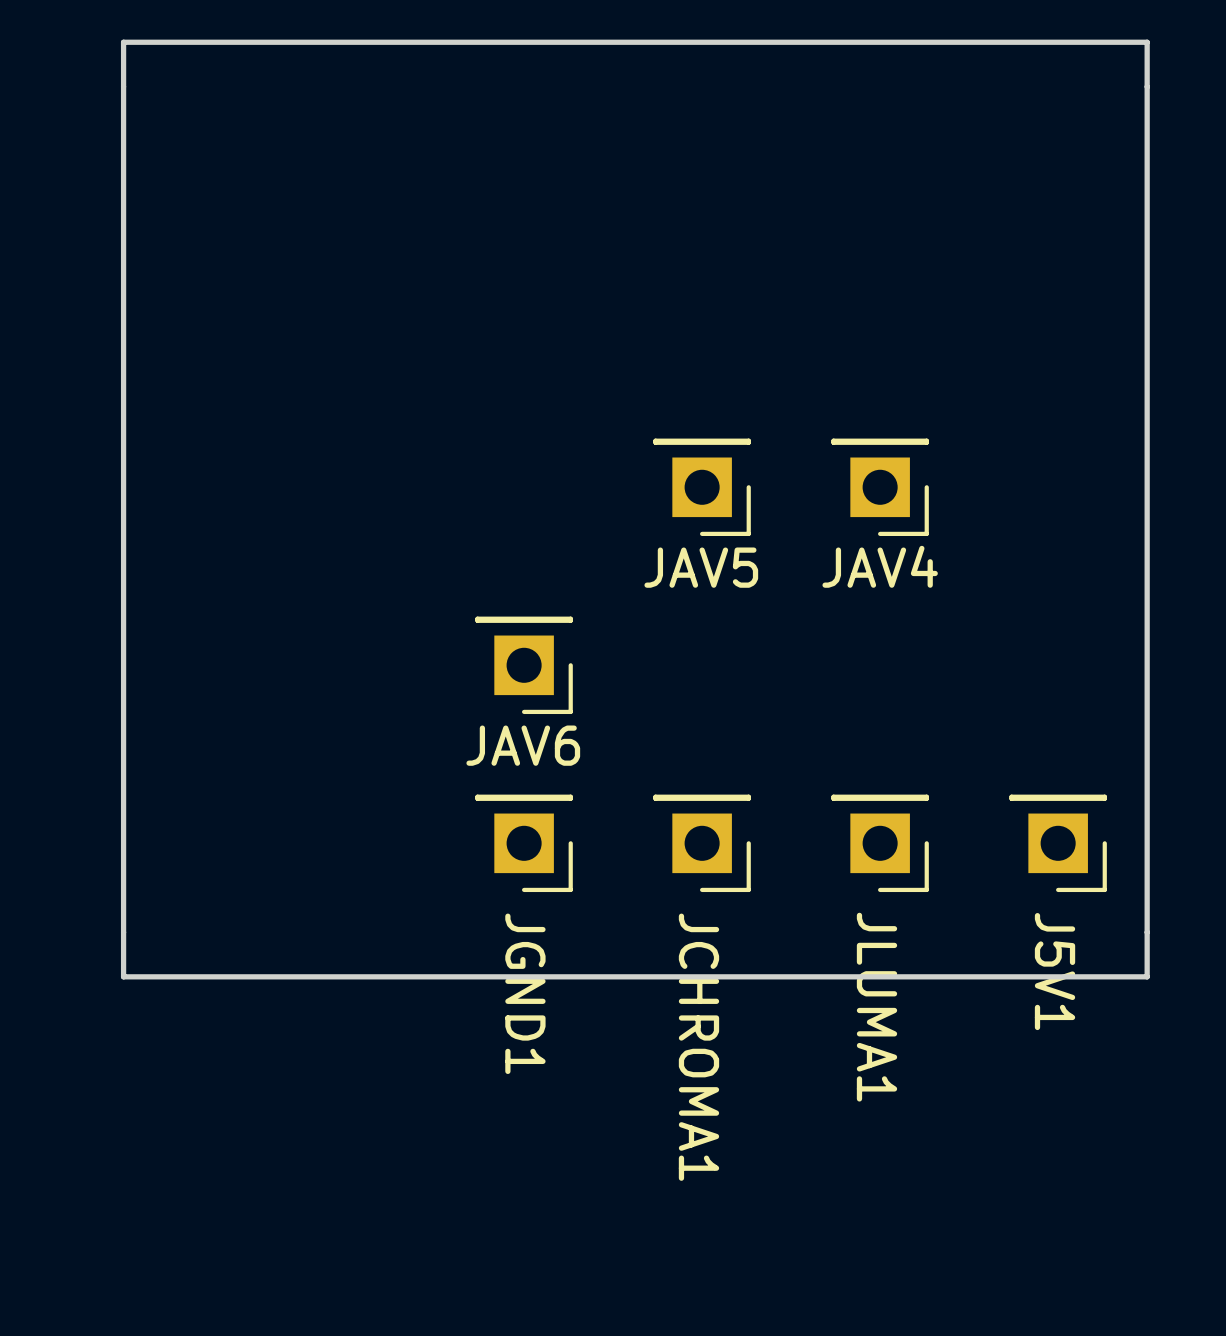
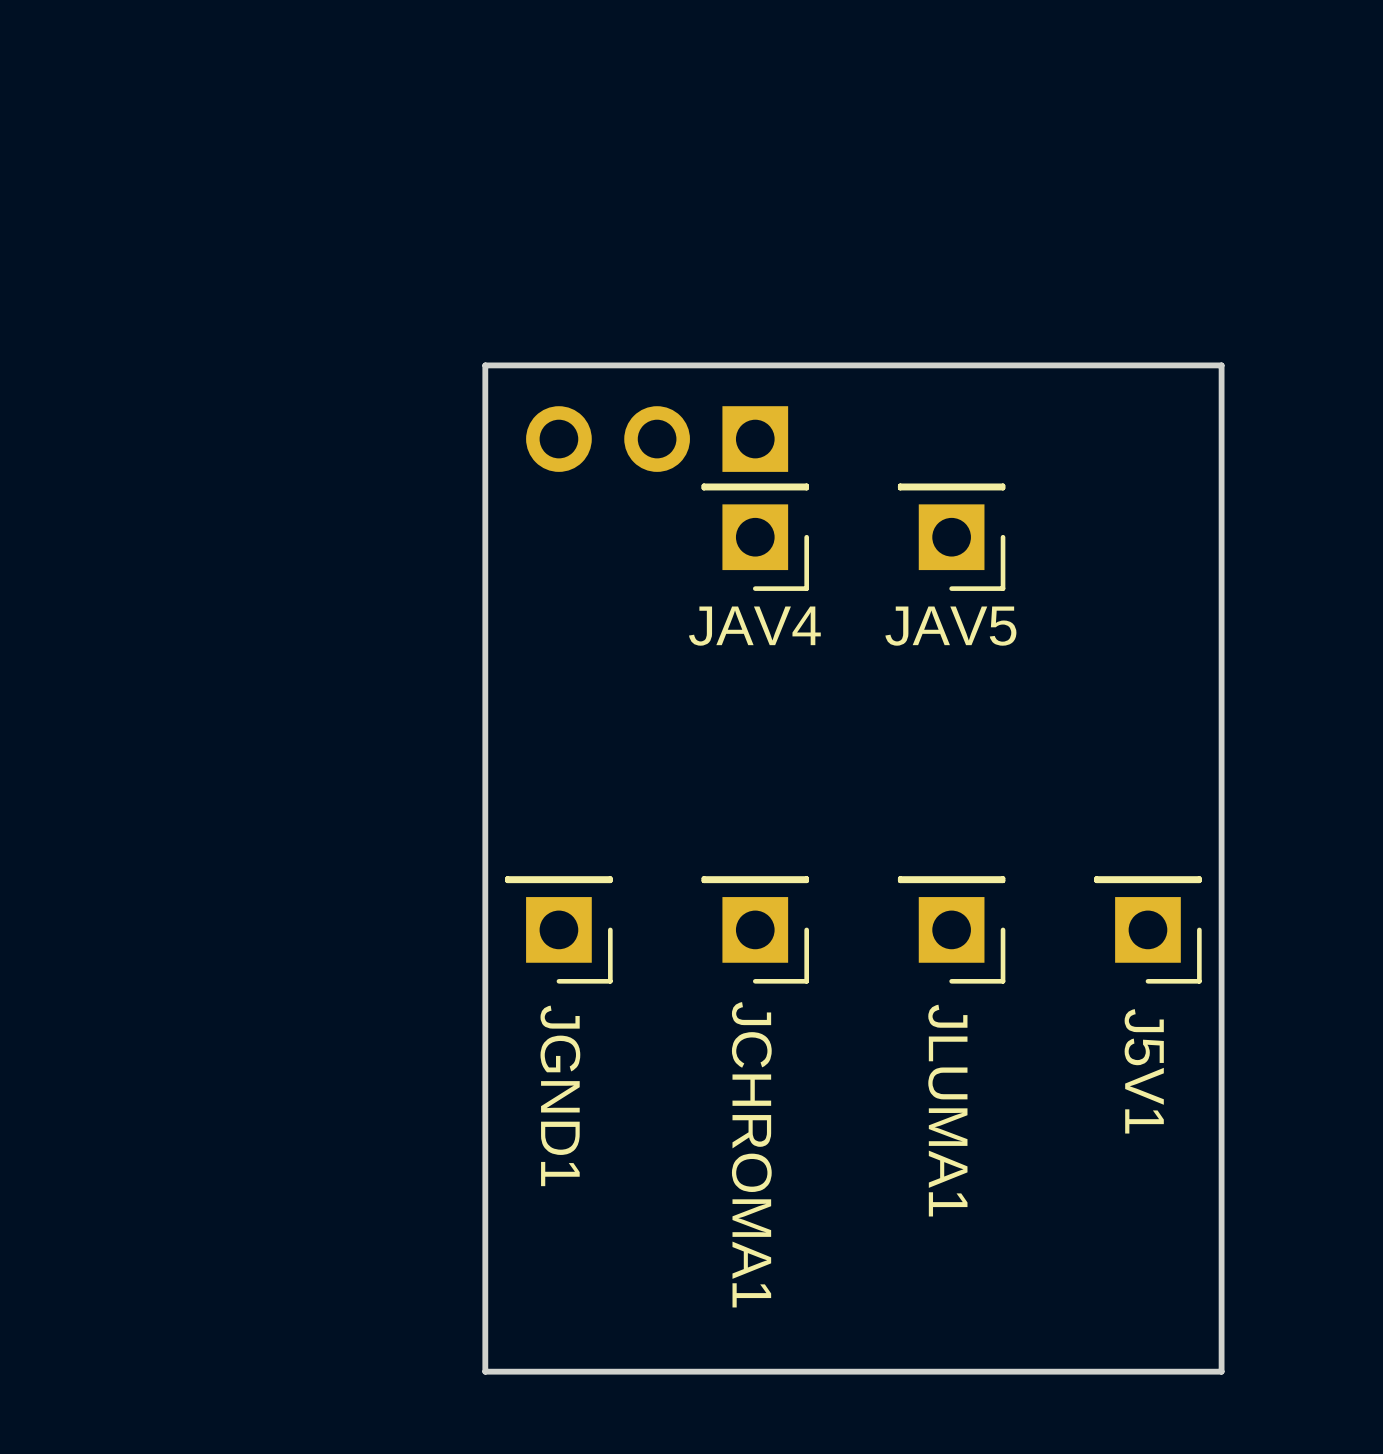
board edge: (1147, 42) (1147, 976) (123, 976) (123, 42) (1147, 42) -> none
board edge: none -> (1221, 365) (485, 365) (485, 1371) (1221, 1371) (1221, 365)
part: none -> (657, 439)
JAV4 name: JAV4 (880, 566) -> JAV5 (950, 626)
JAV5 name: JAV5 (701, 567) -> JAV4 (754, 626)
JAV6: (524, 665) -> none

